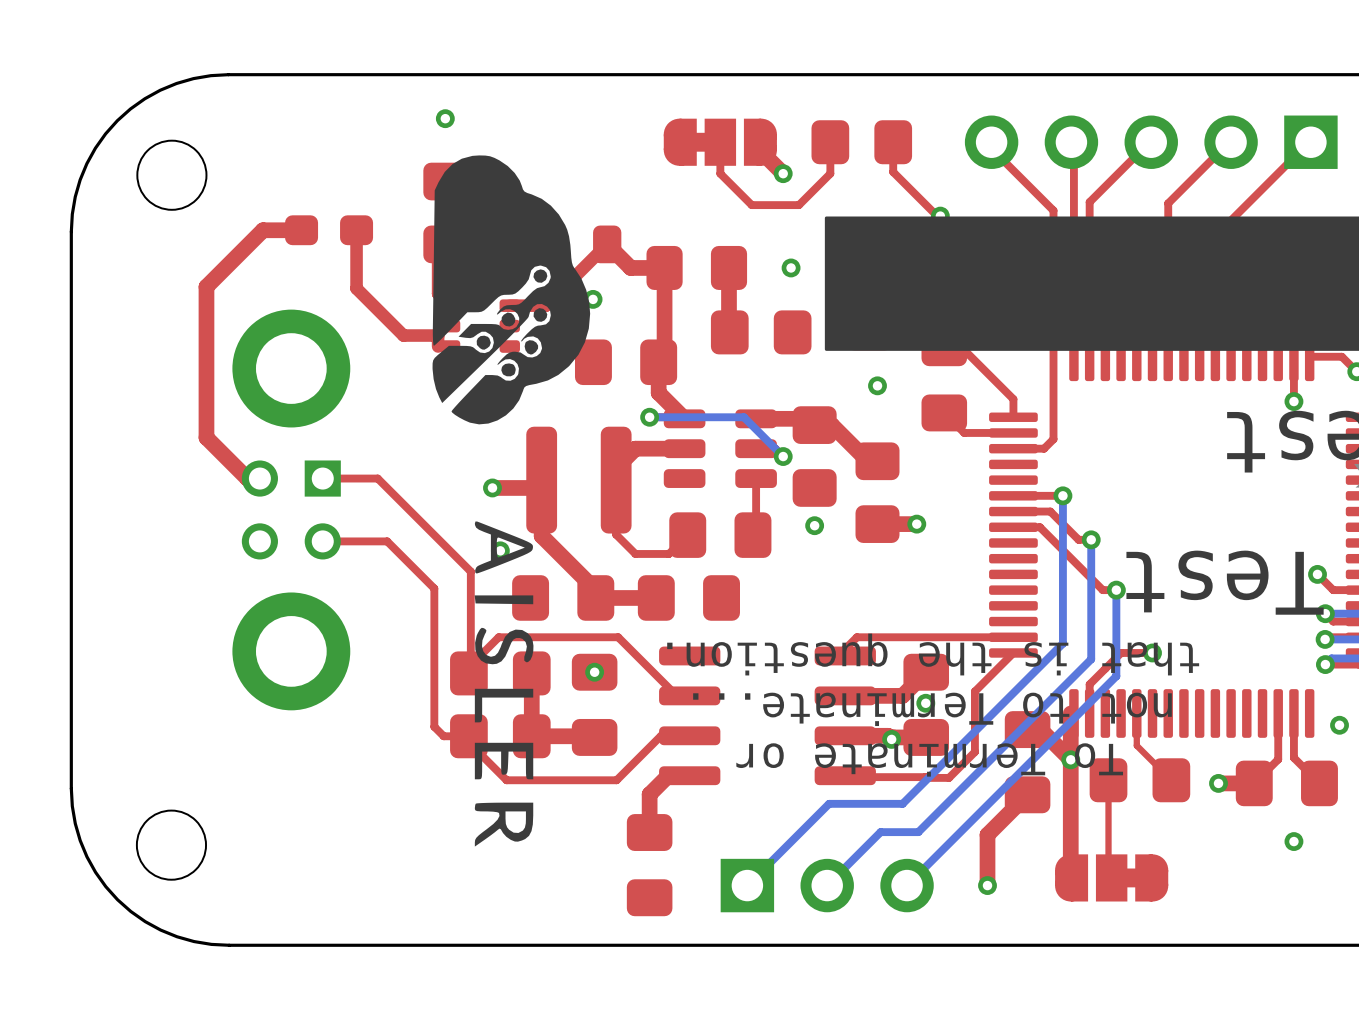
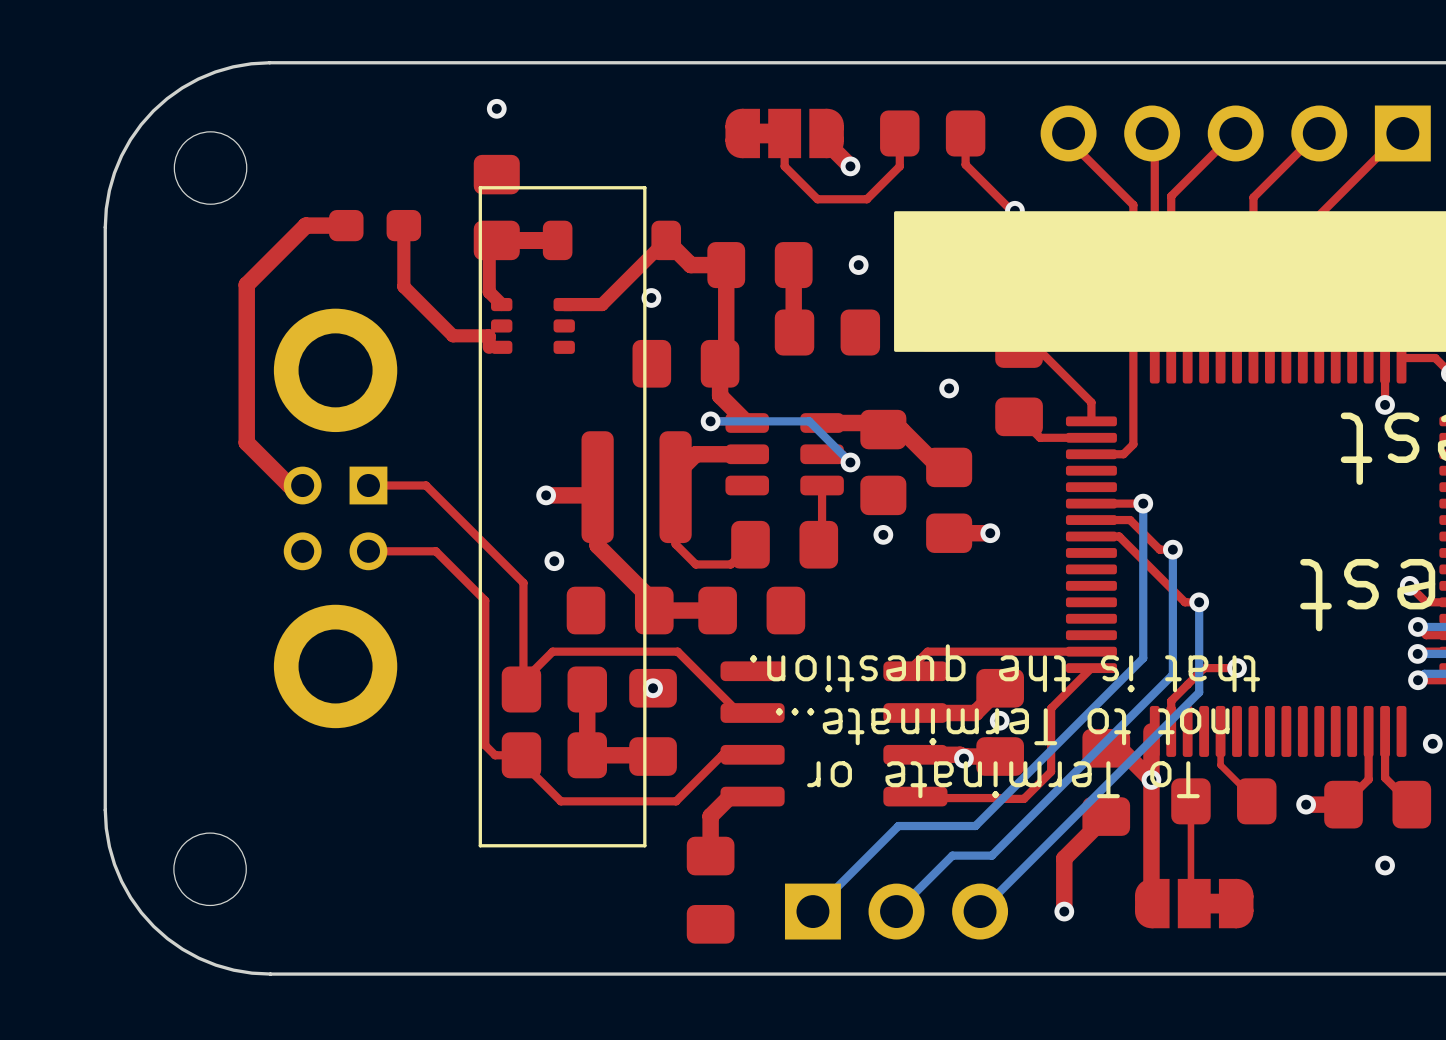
drawing: [432, 155, 591, 847] -> none
line: none -> (644, 187) (480, 187) (480, 845) (644, 845) (644, 187)

